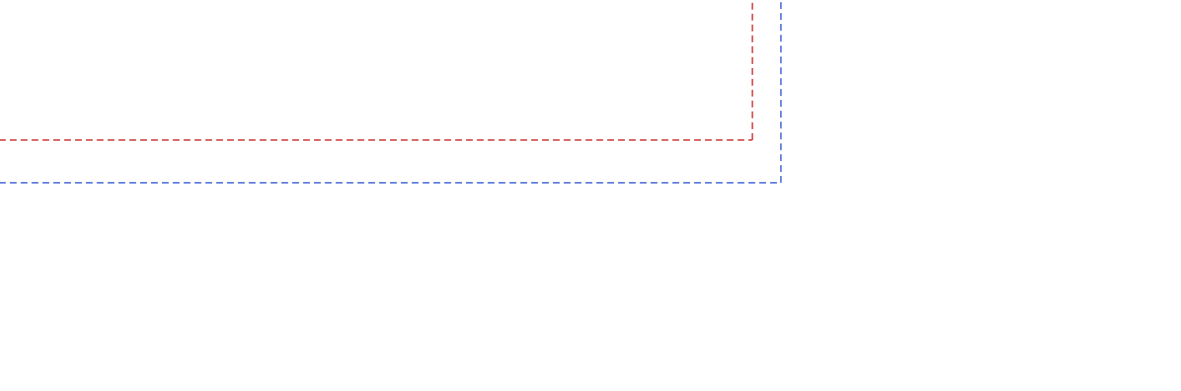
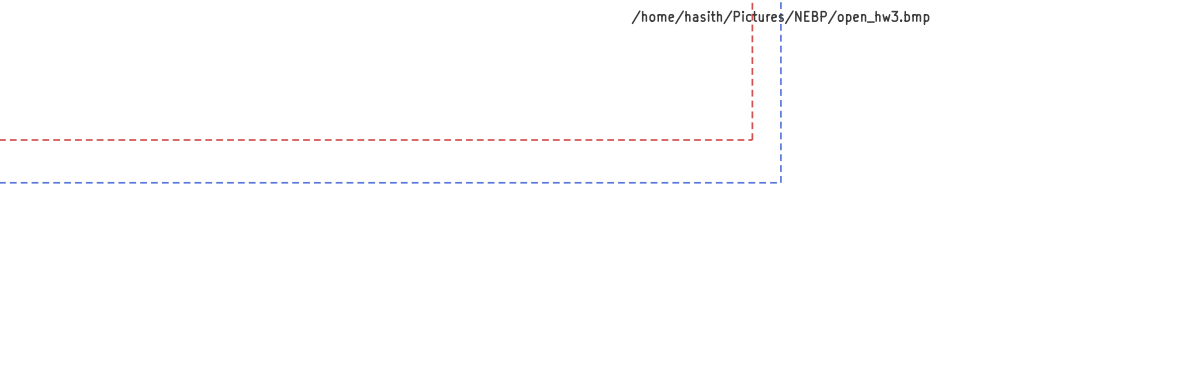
text: none -> /home/hasith/Pictures/NEBP/open_hw3.bmp (780, 17)

